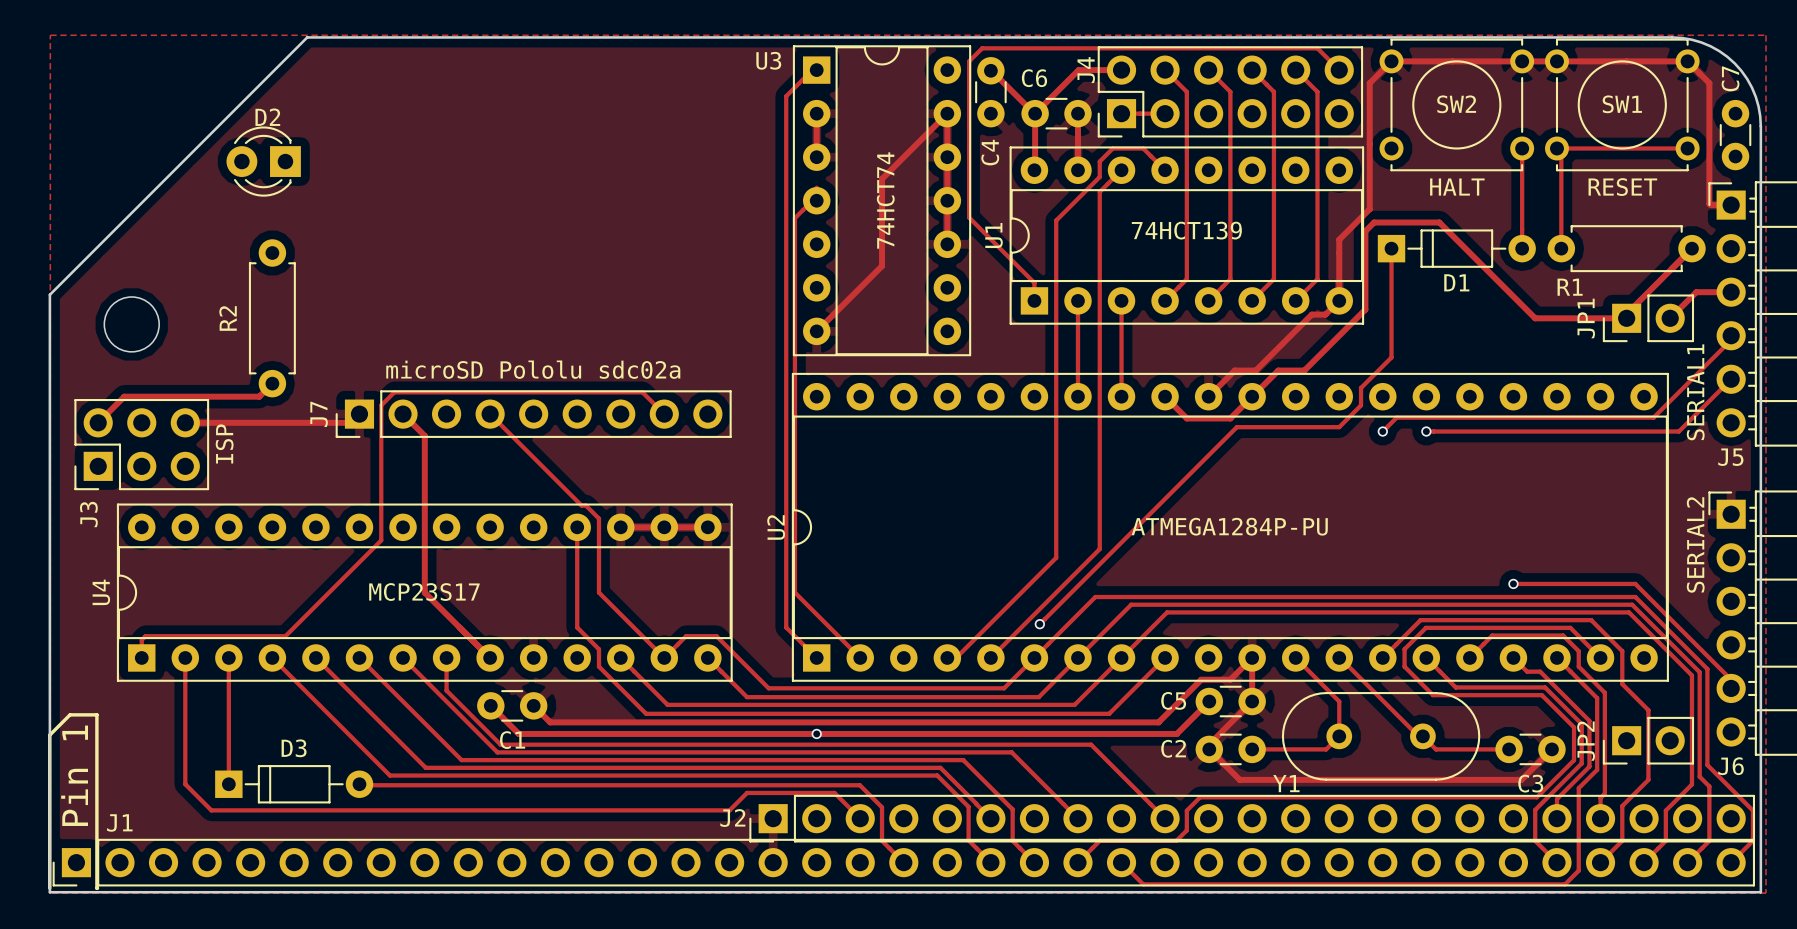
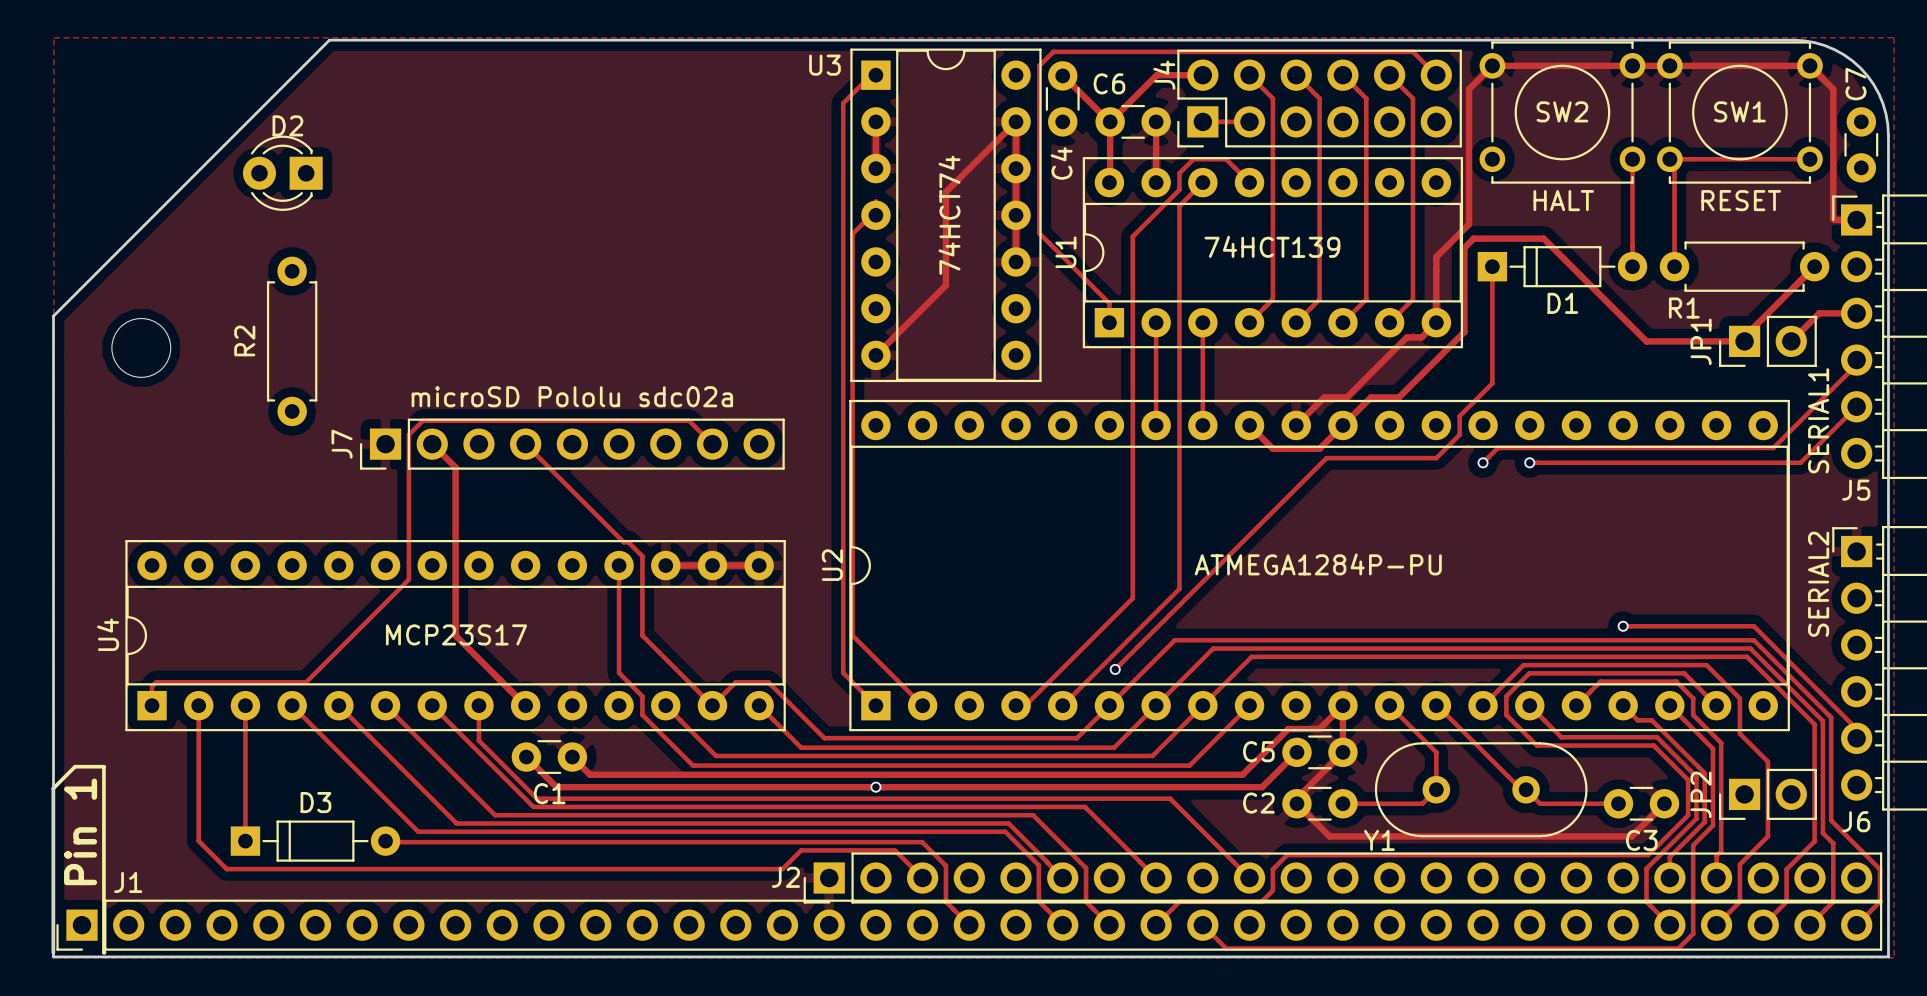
track: (272, 383) (259, 396) (124, 396) (98, 422) -> none
track: (359, 414) (350, 422) (185, 422) -> none
J3: ISP (141, 444) -> none

